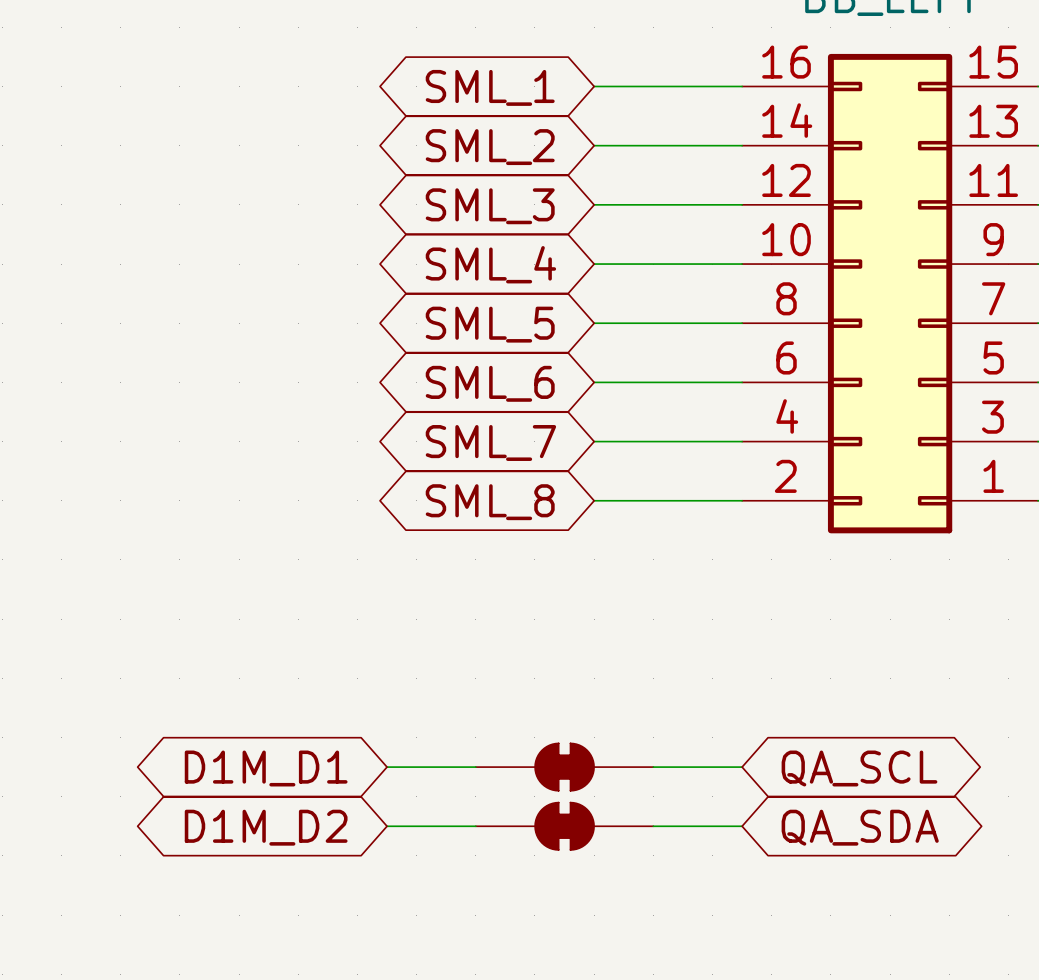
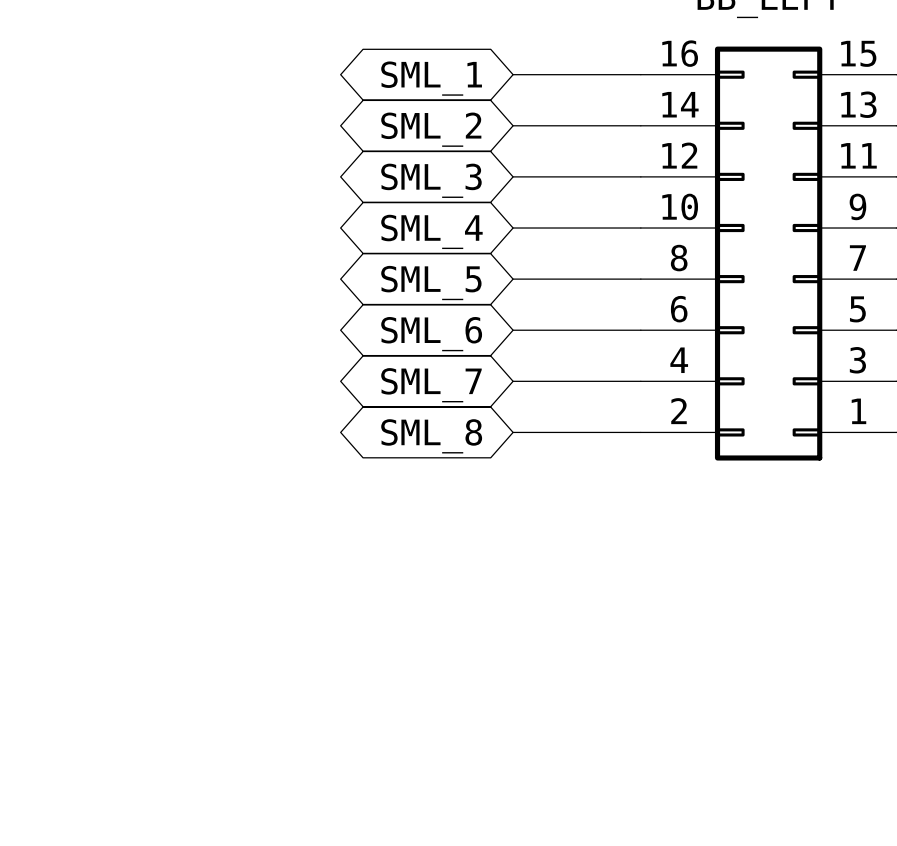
wire: (387, 767) (475, 767) -> none
part: (564, 767) -> none
wire: (653, 767) (742, 767) -> none
global label: D1M_D1 (266, 768) -> none
global label: QA_SCL (859, 768) -> none
wire: (387, 826) (475, 826) -> none
part: (564, 826) -> none
wire: (653, 826) (742, 826) -> none
global label: D1M_D2 (266, 827) -> none
global label: QA_SDA (860, 827) -> none

